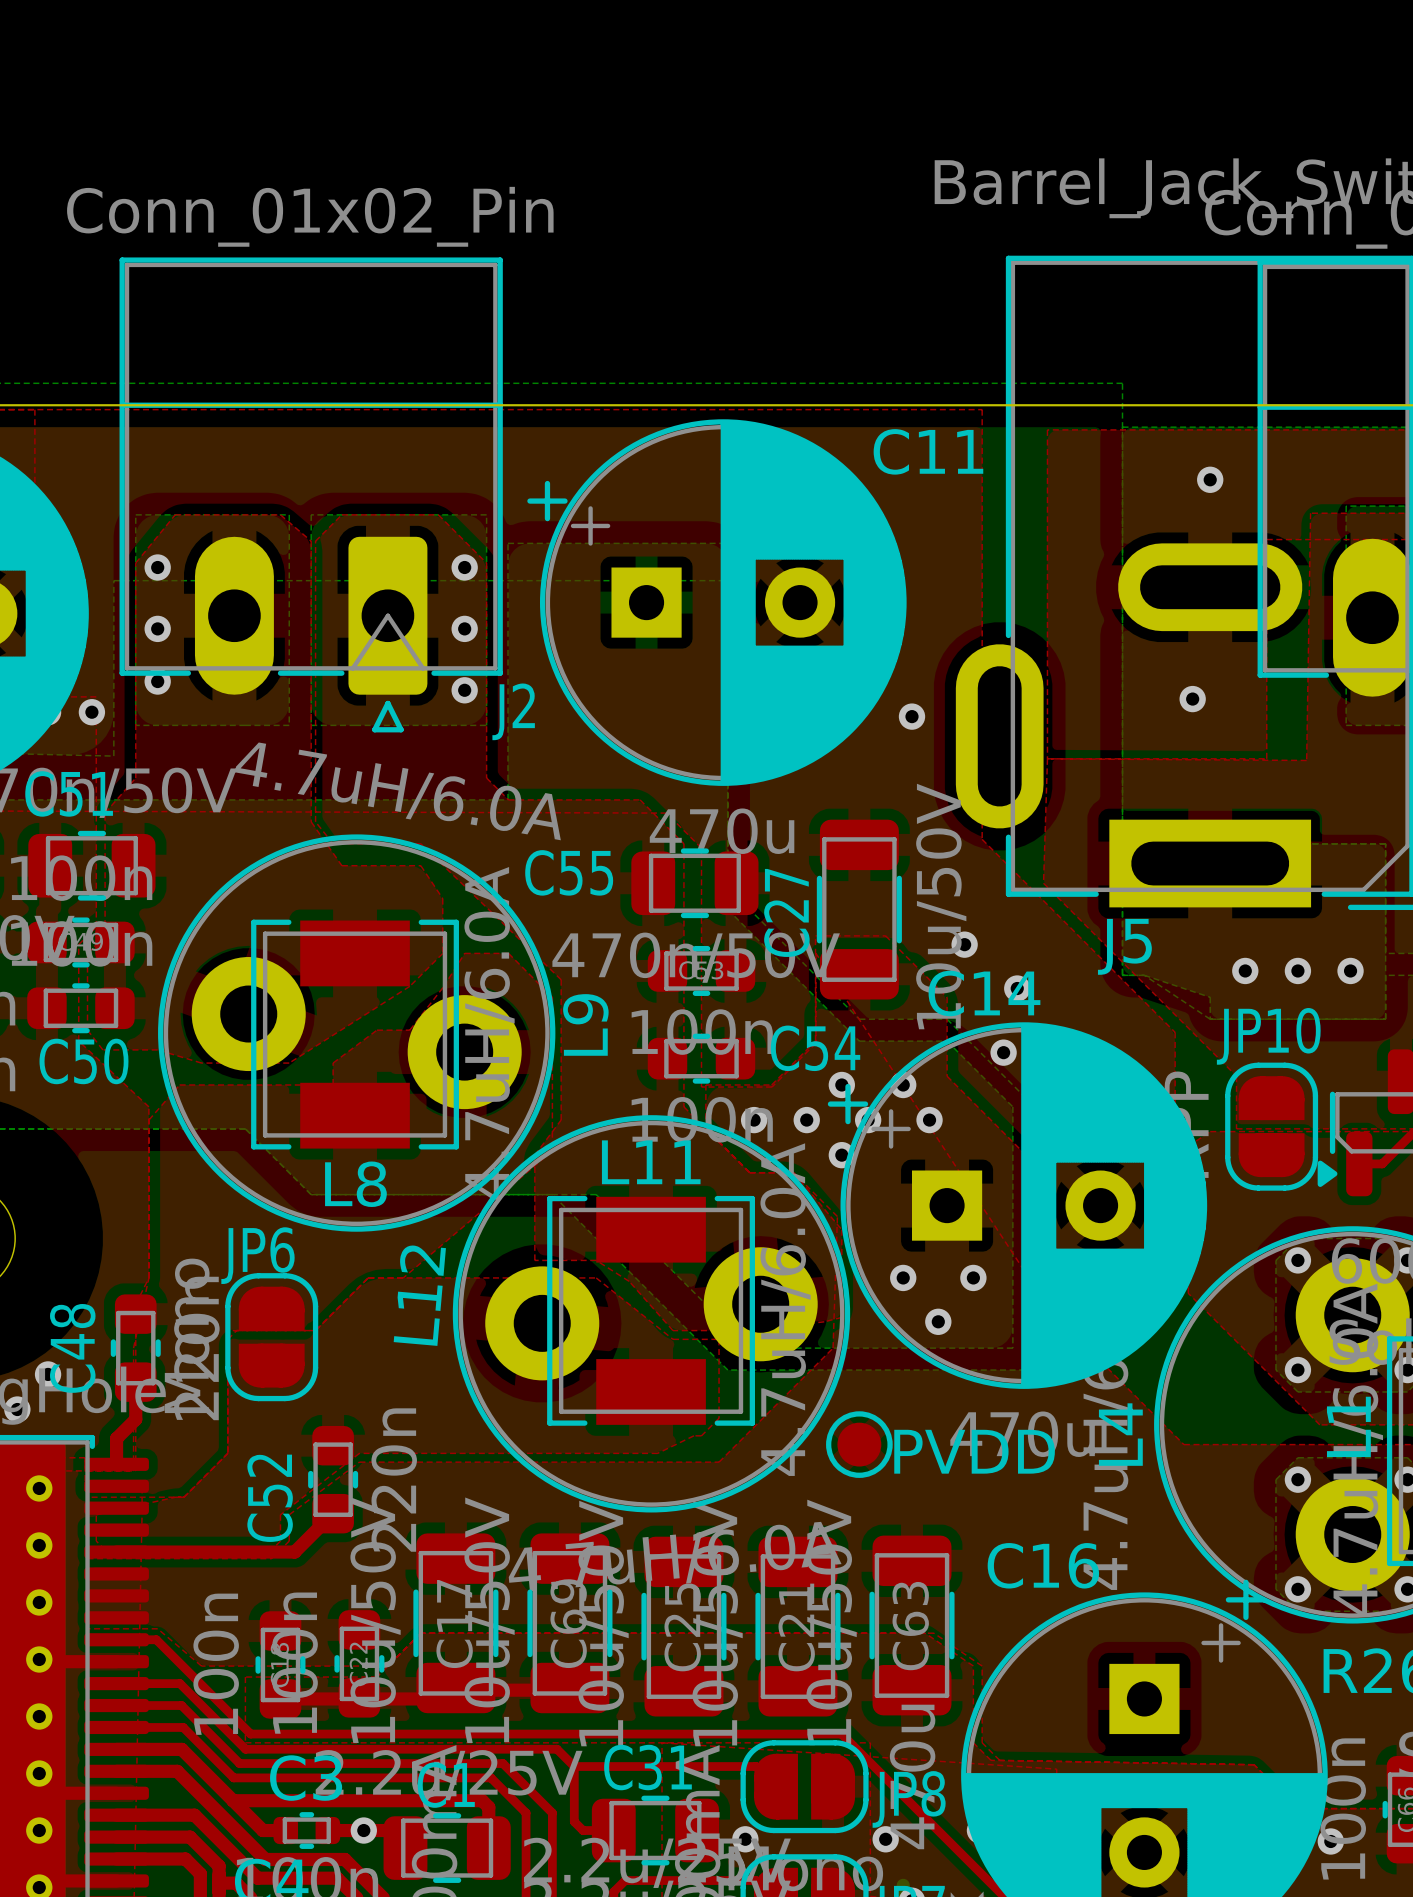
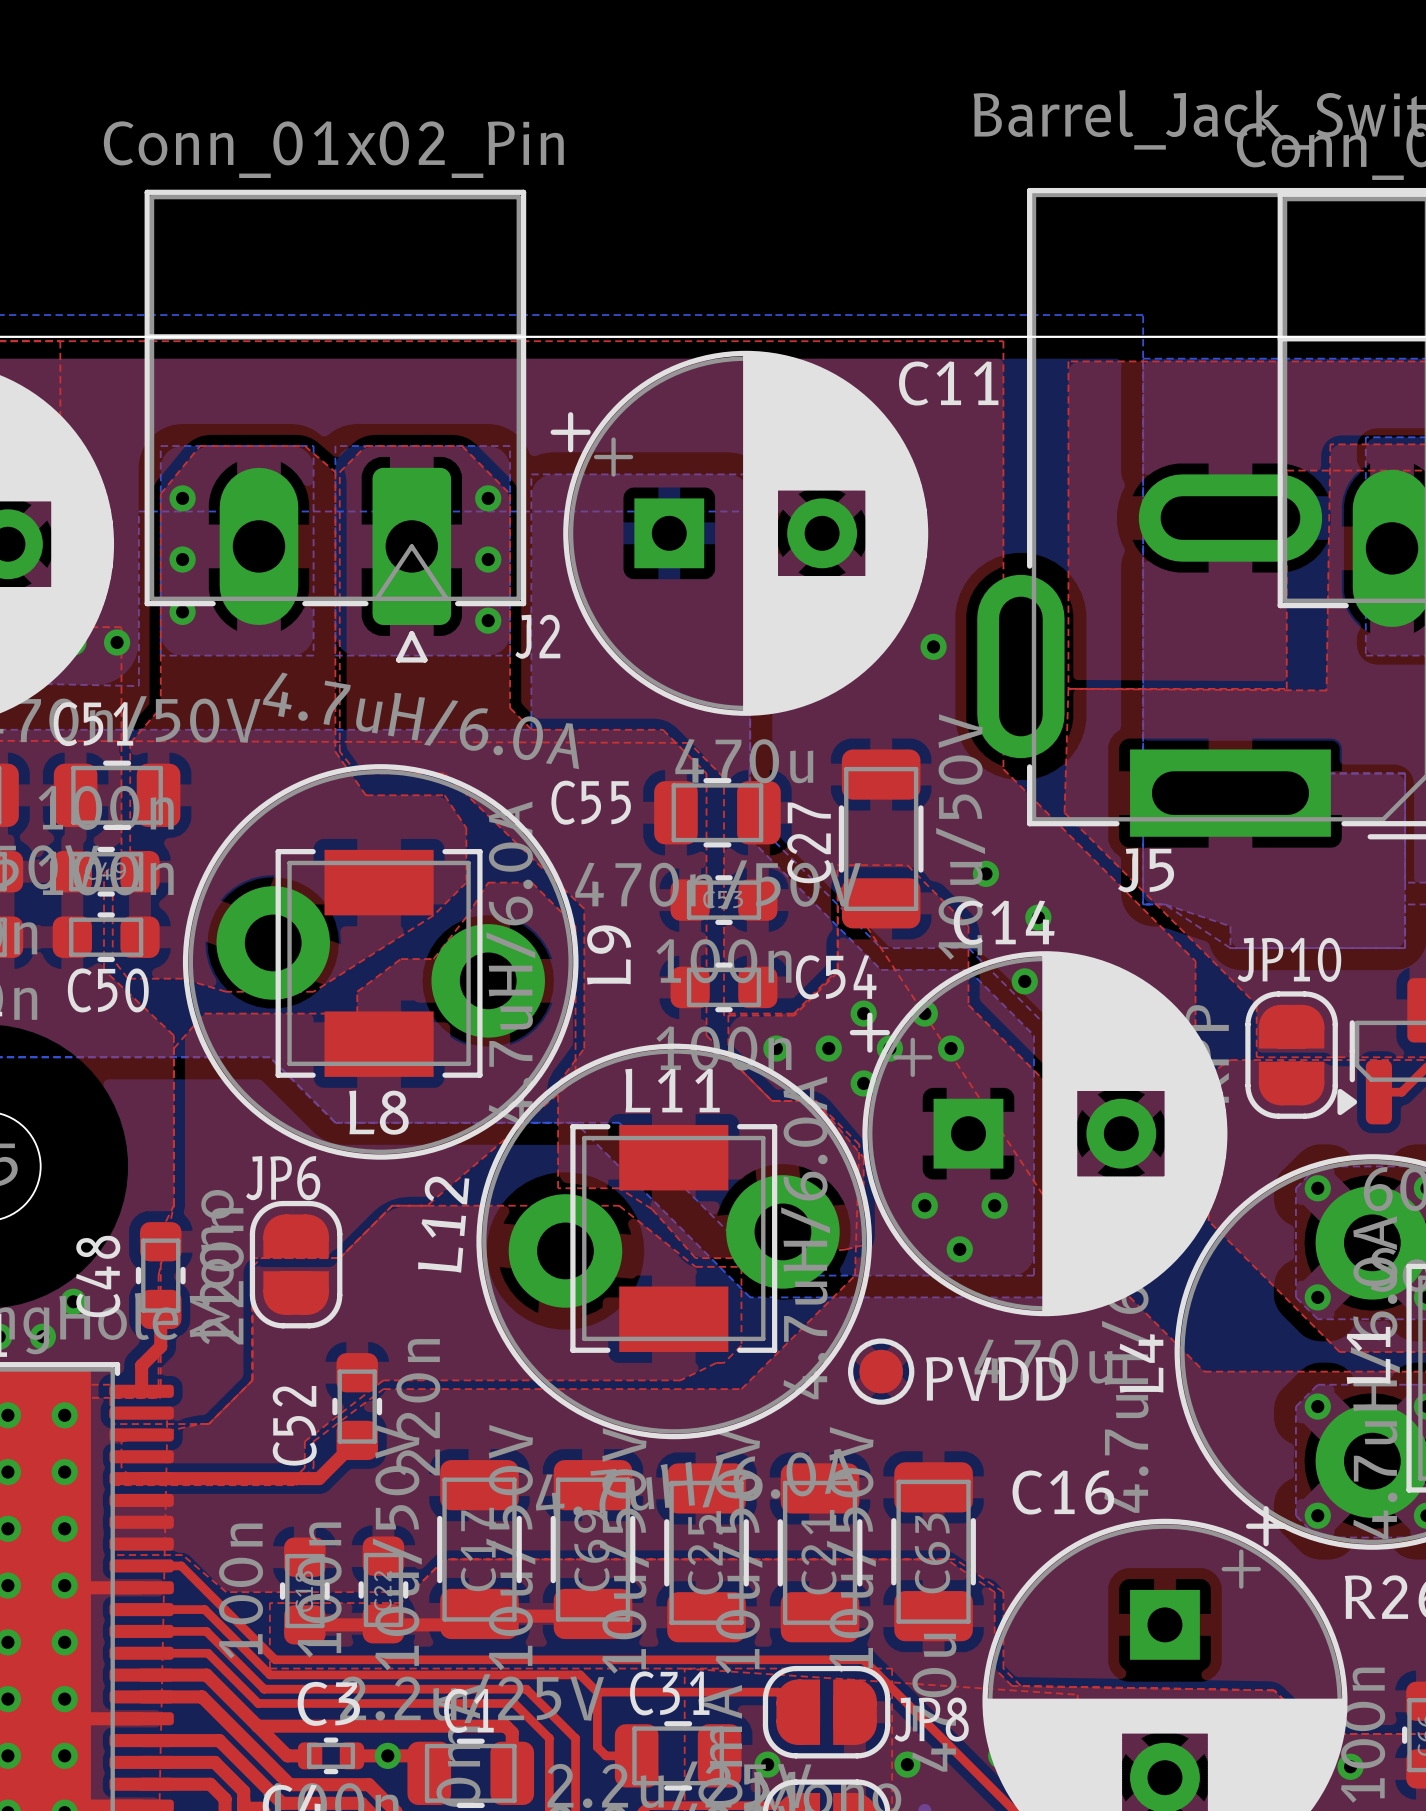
via: (1210, 479) -> none
via: (1192, 699) -> none
via: (1245, 970) -> none
via: (1297, 970) -> none
via: (1350, 970) -> none

